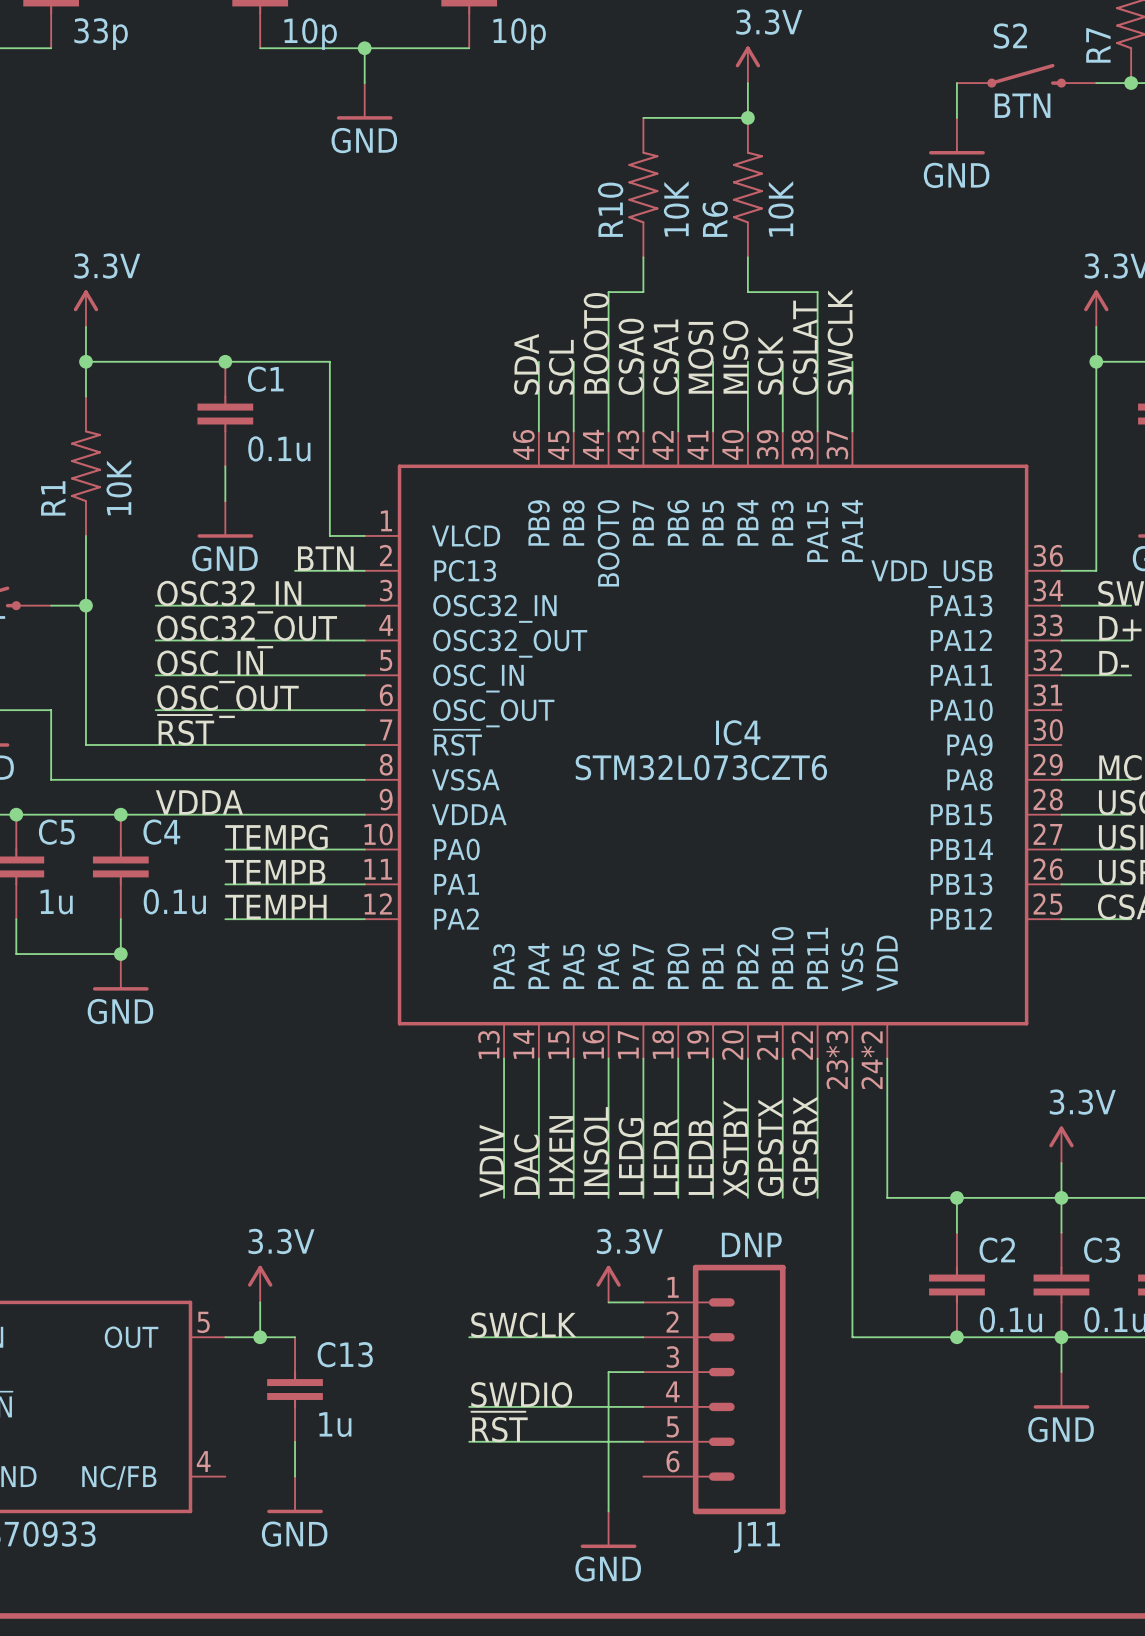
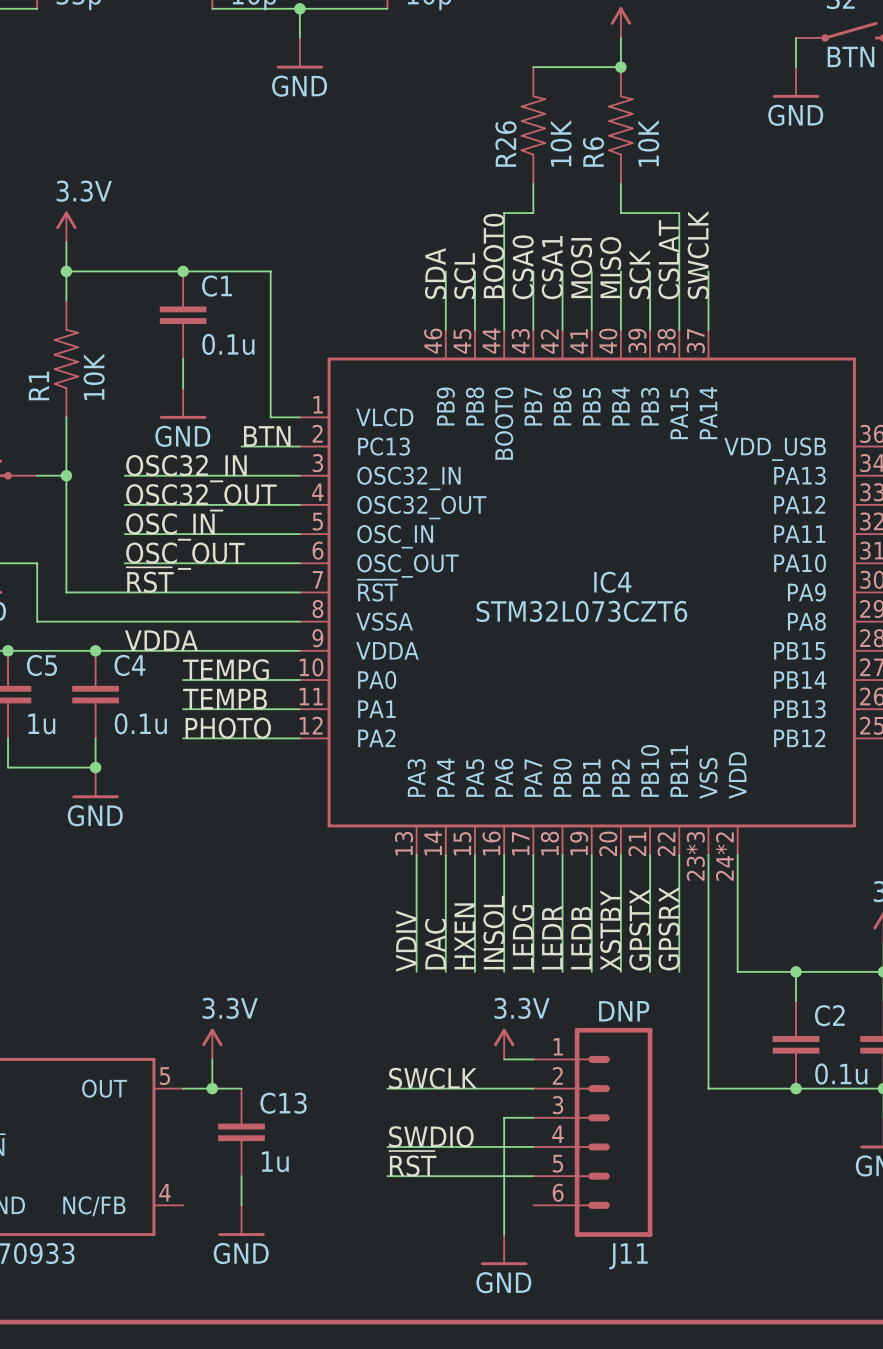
R10 name: R10 (610, 209) -> R26 (505, 144)
label: TEMPH (275, 907) -> PHOTO (228, 728)

